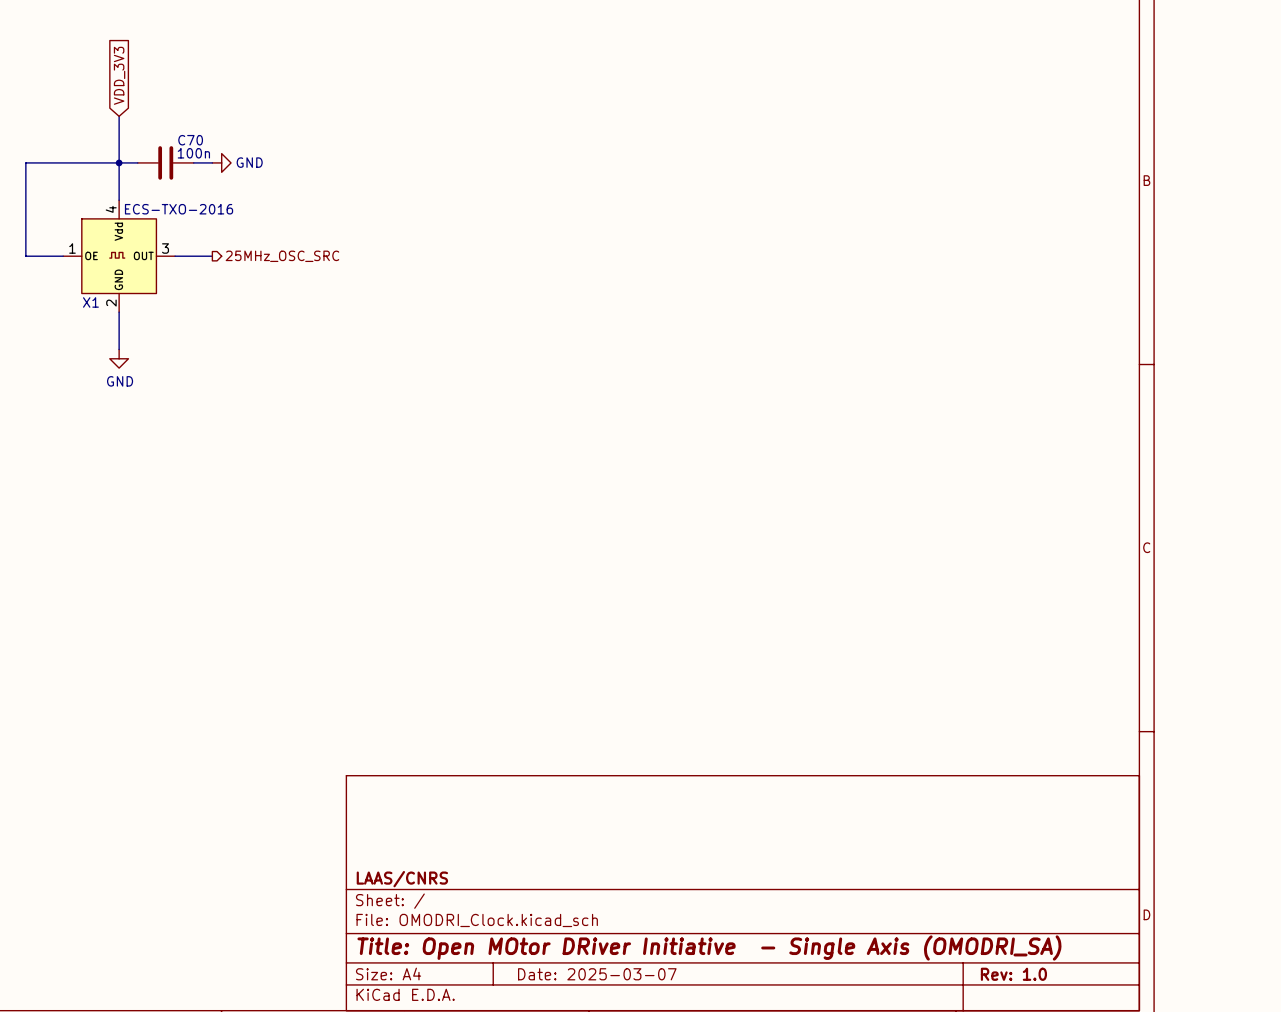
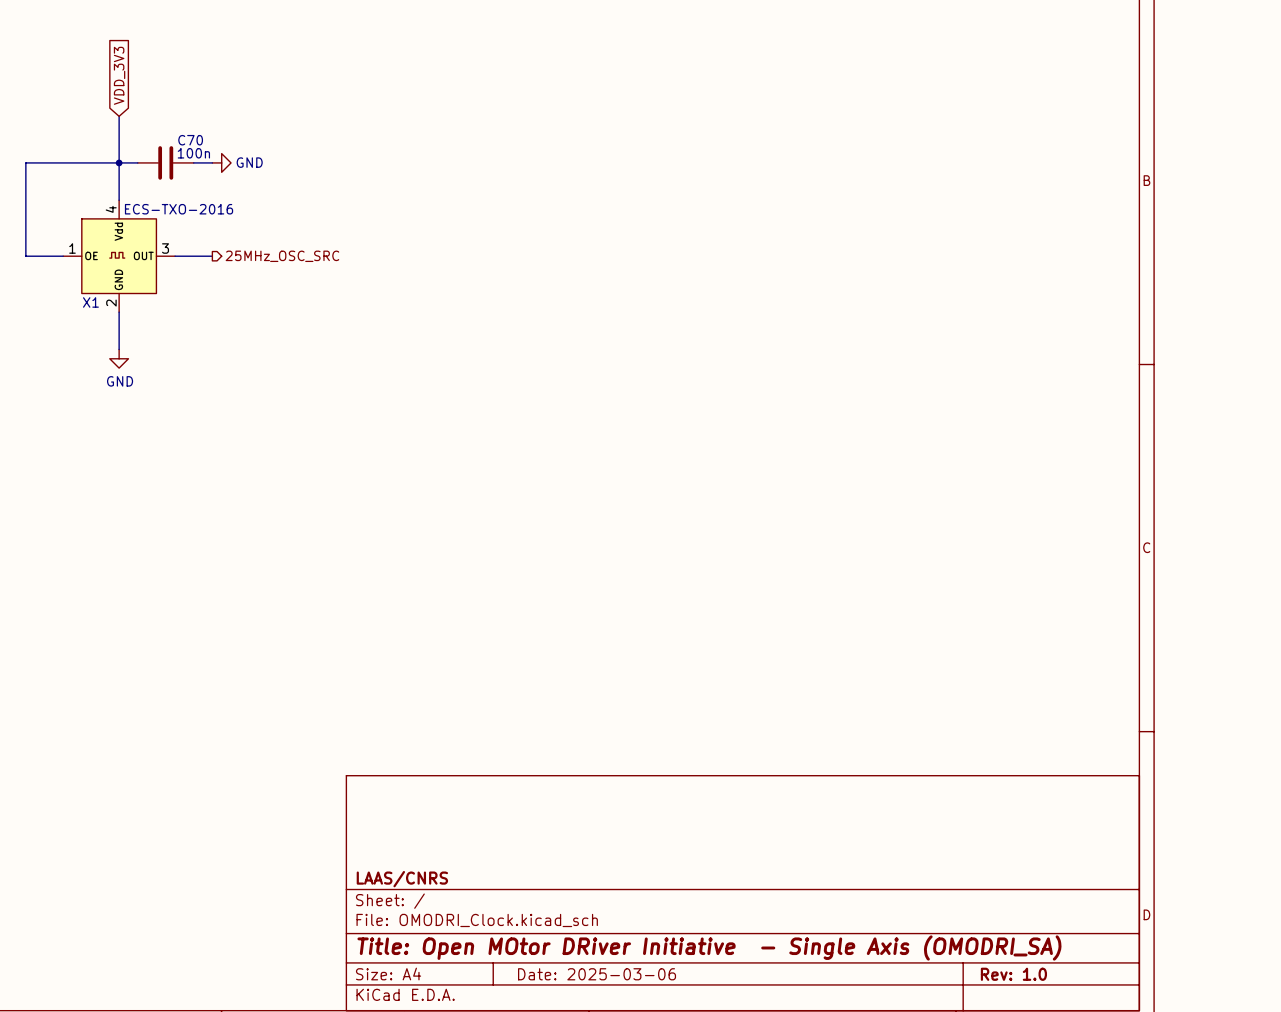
title block: Date: 2025-03-07 (597, 974) -> Date: 2025-03-06 (597, 974)

